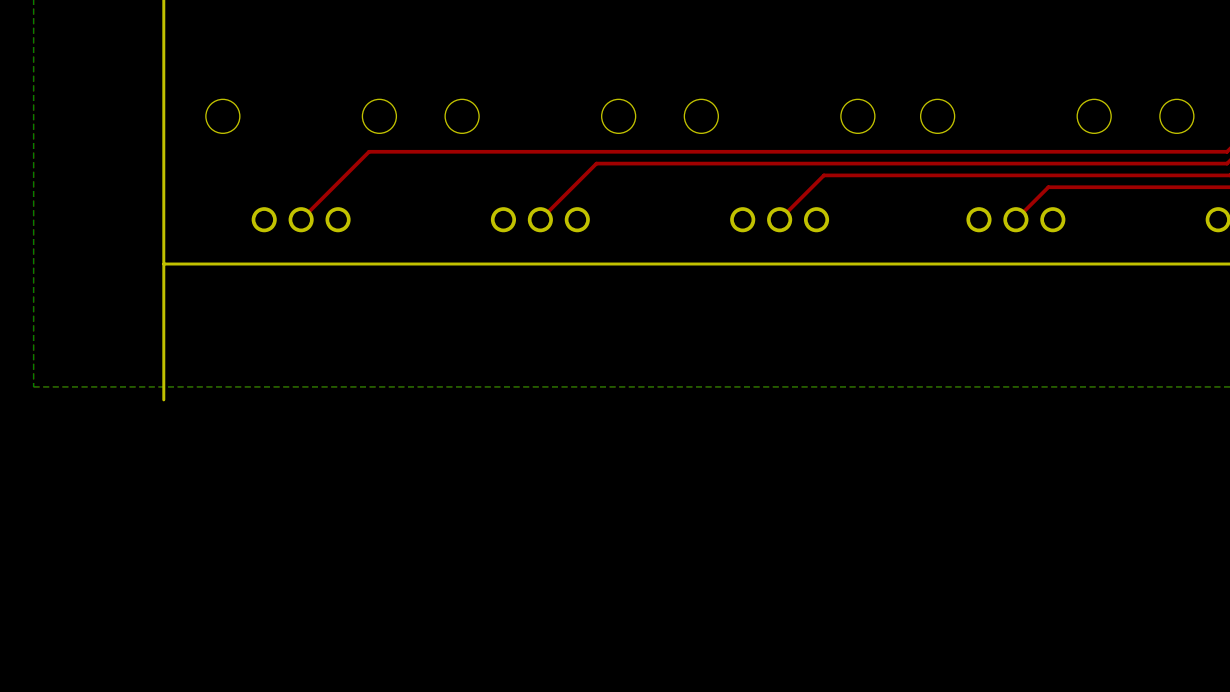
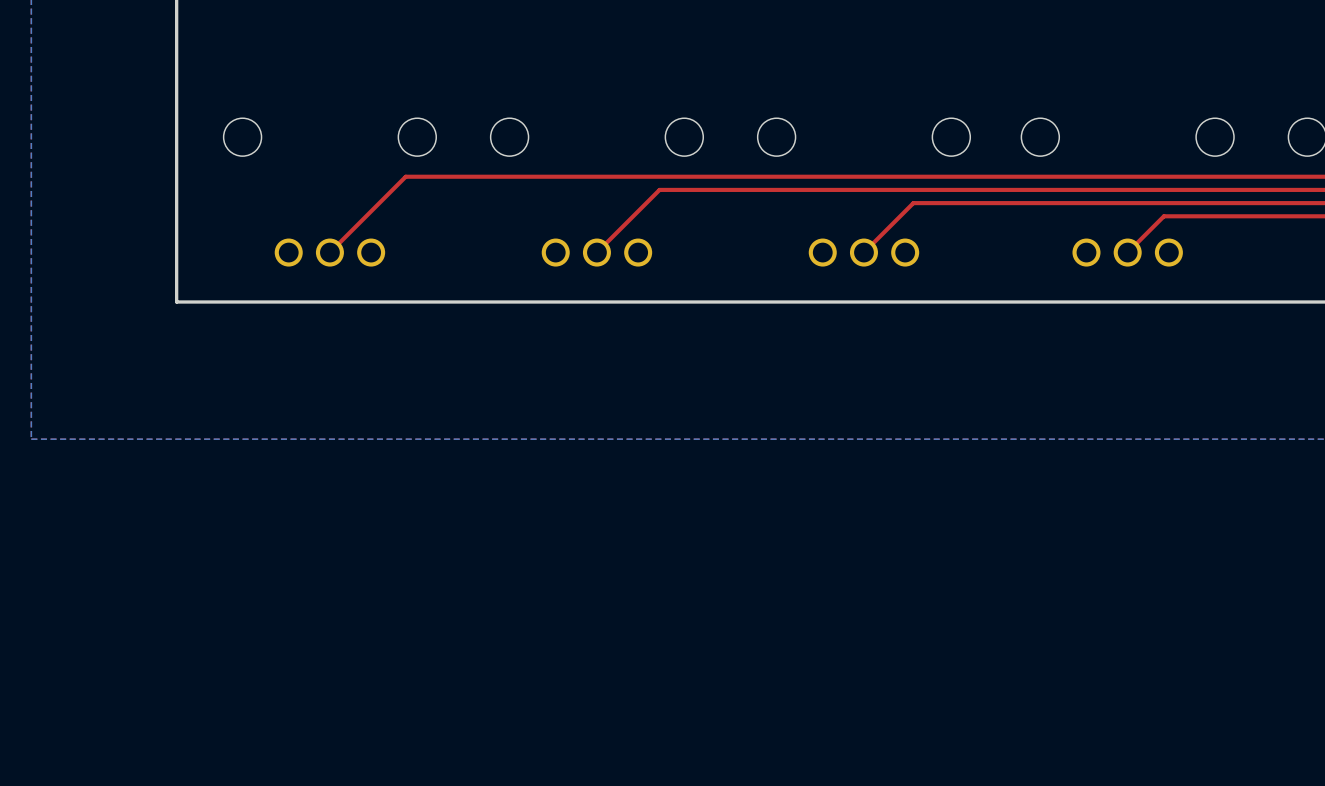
board edge: (163, 264) (163, 399) -> none

